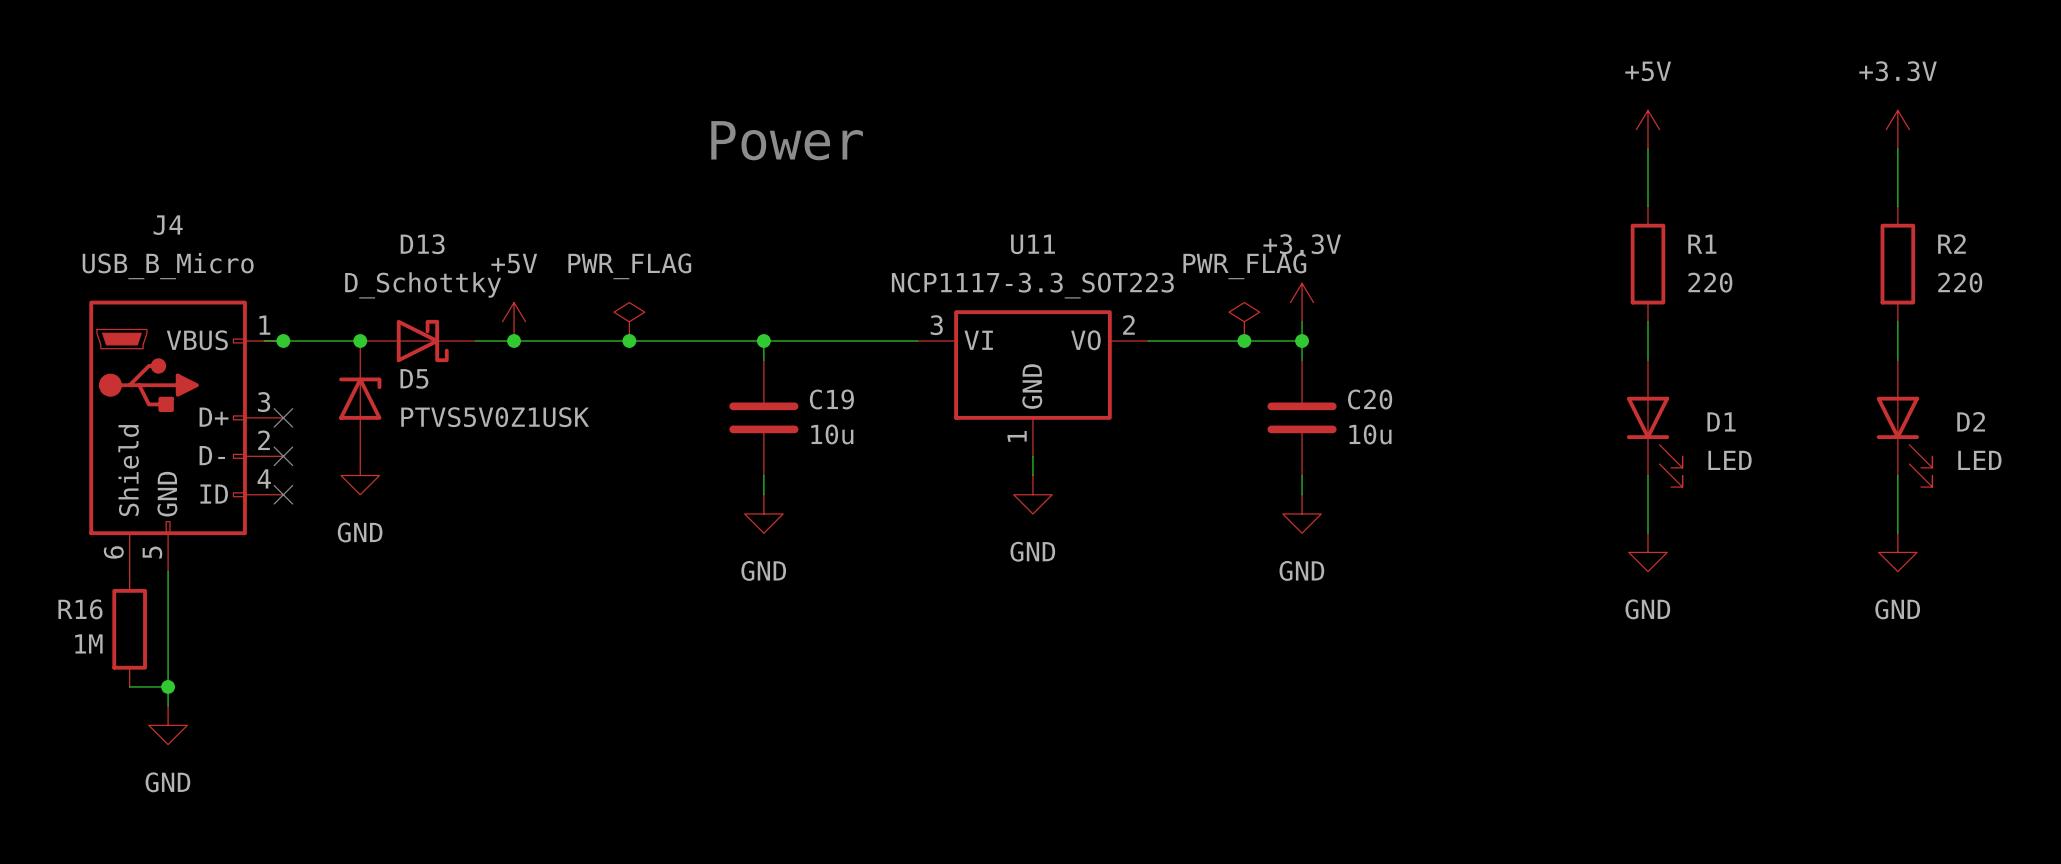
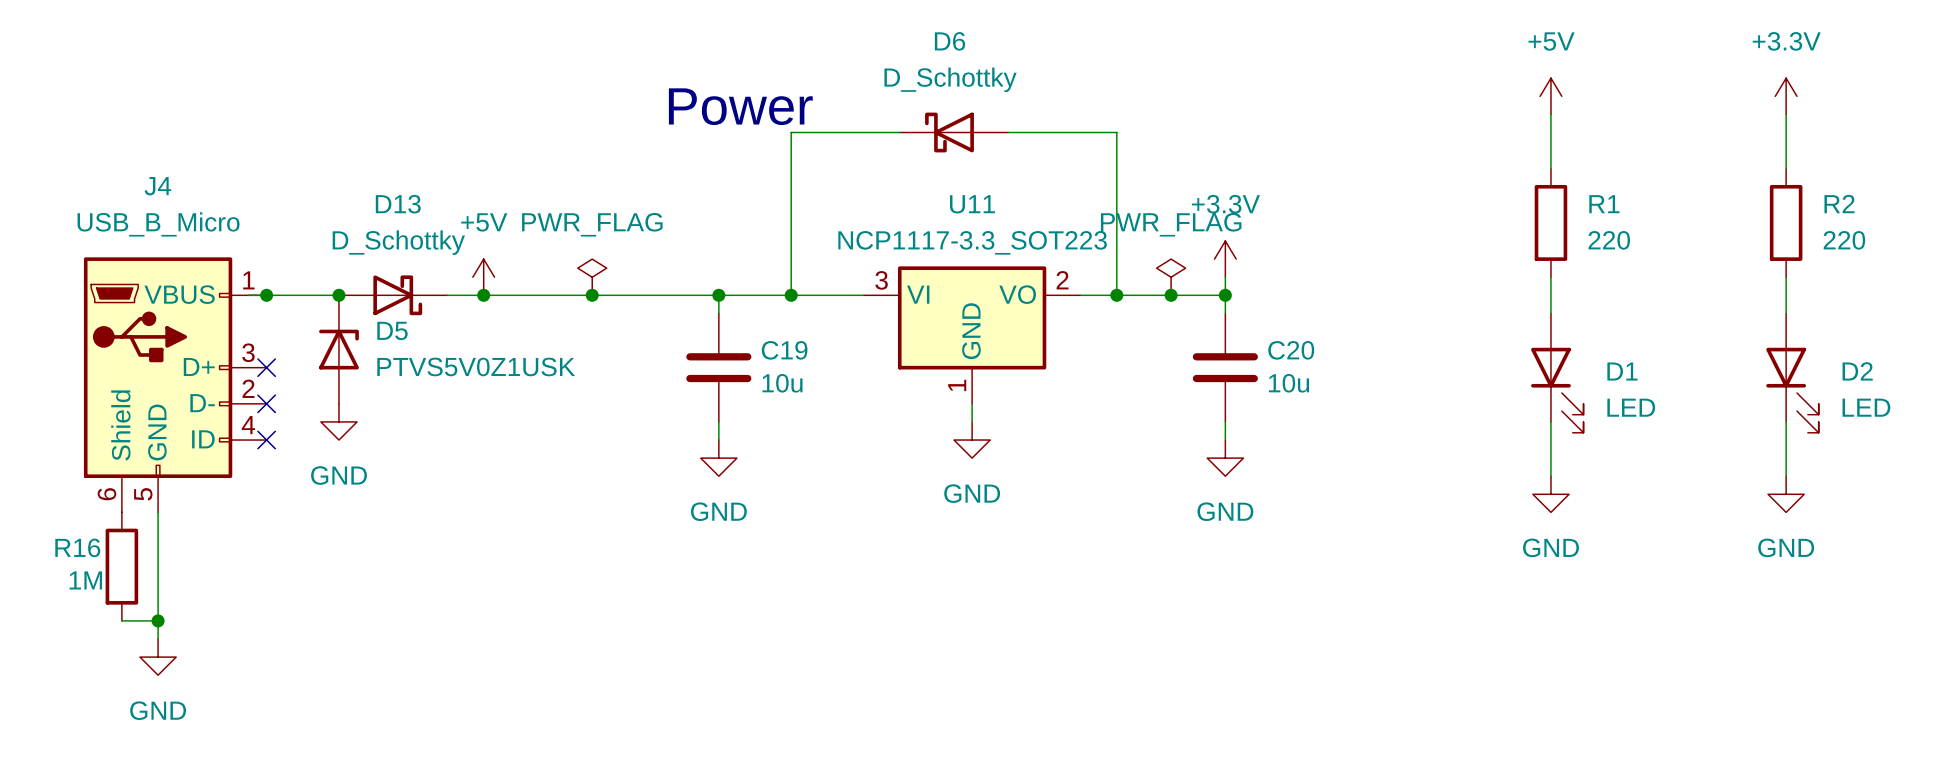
wire: none -> (899, 132) (791, 132) (791, 295)
D6: none -> D_Schottky (954, 132)
wire: none -> (1008, 132) (1116, 132) (1116, 295)
junction: none -> (791, 295)
junction: none -> (1116, 295)

